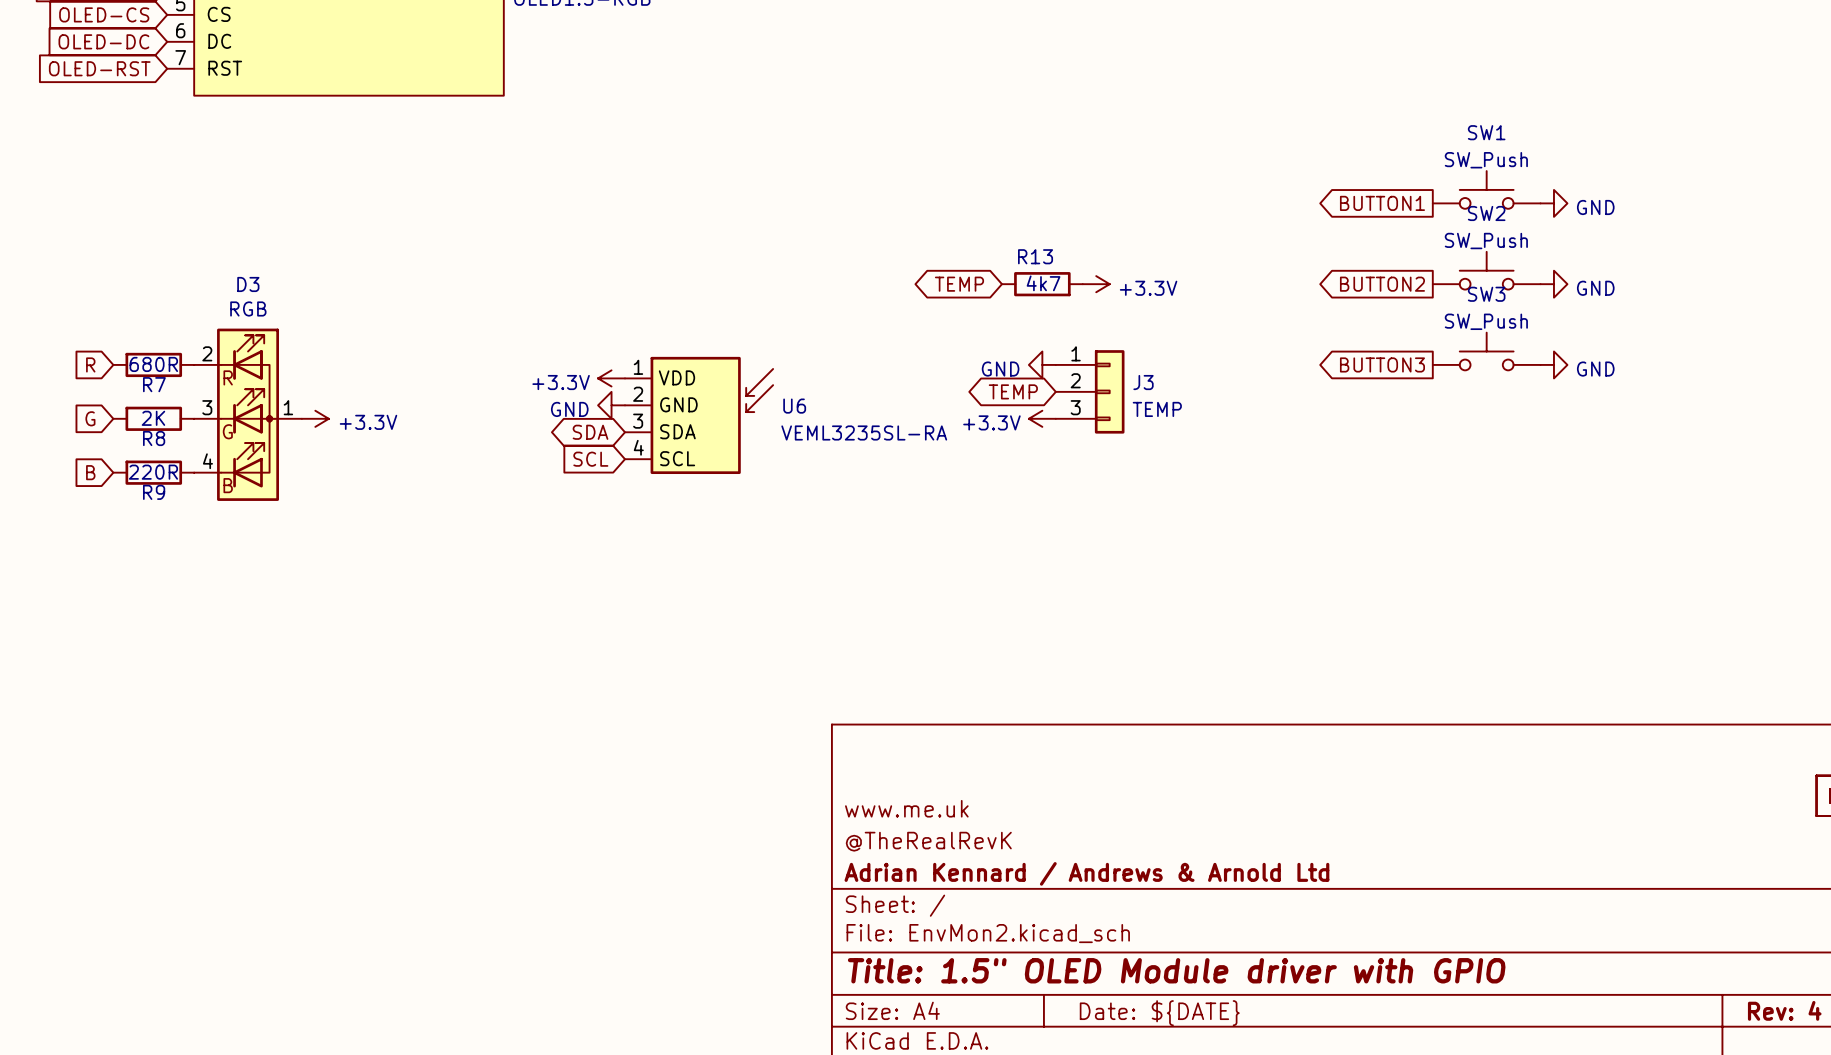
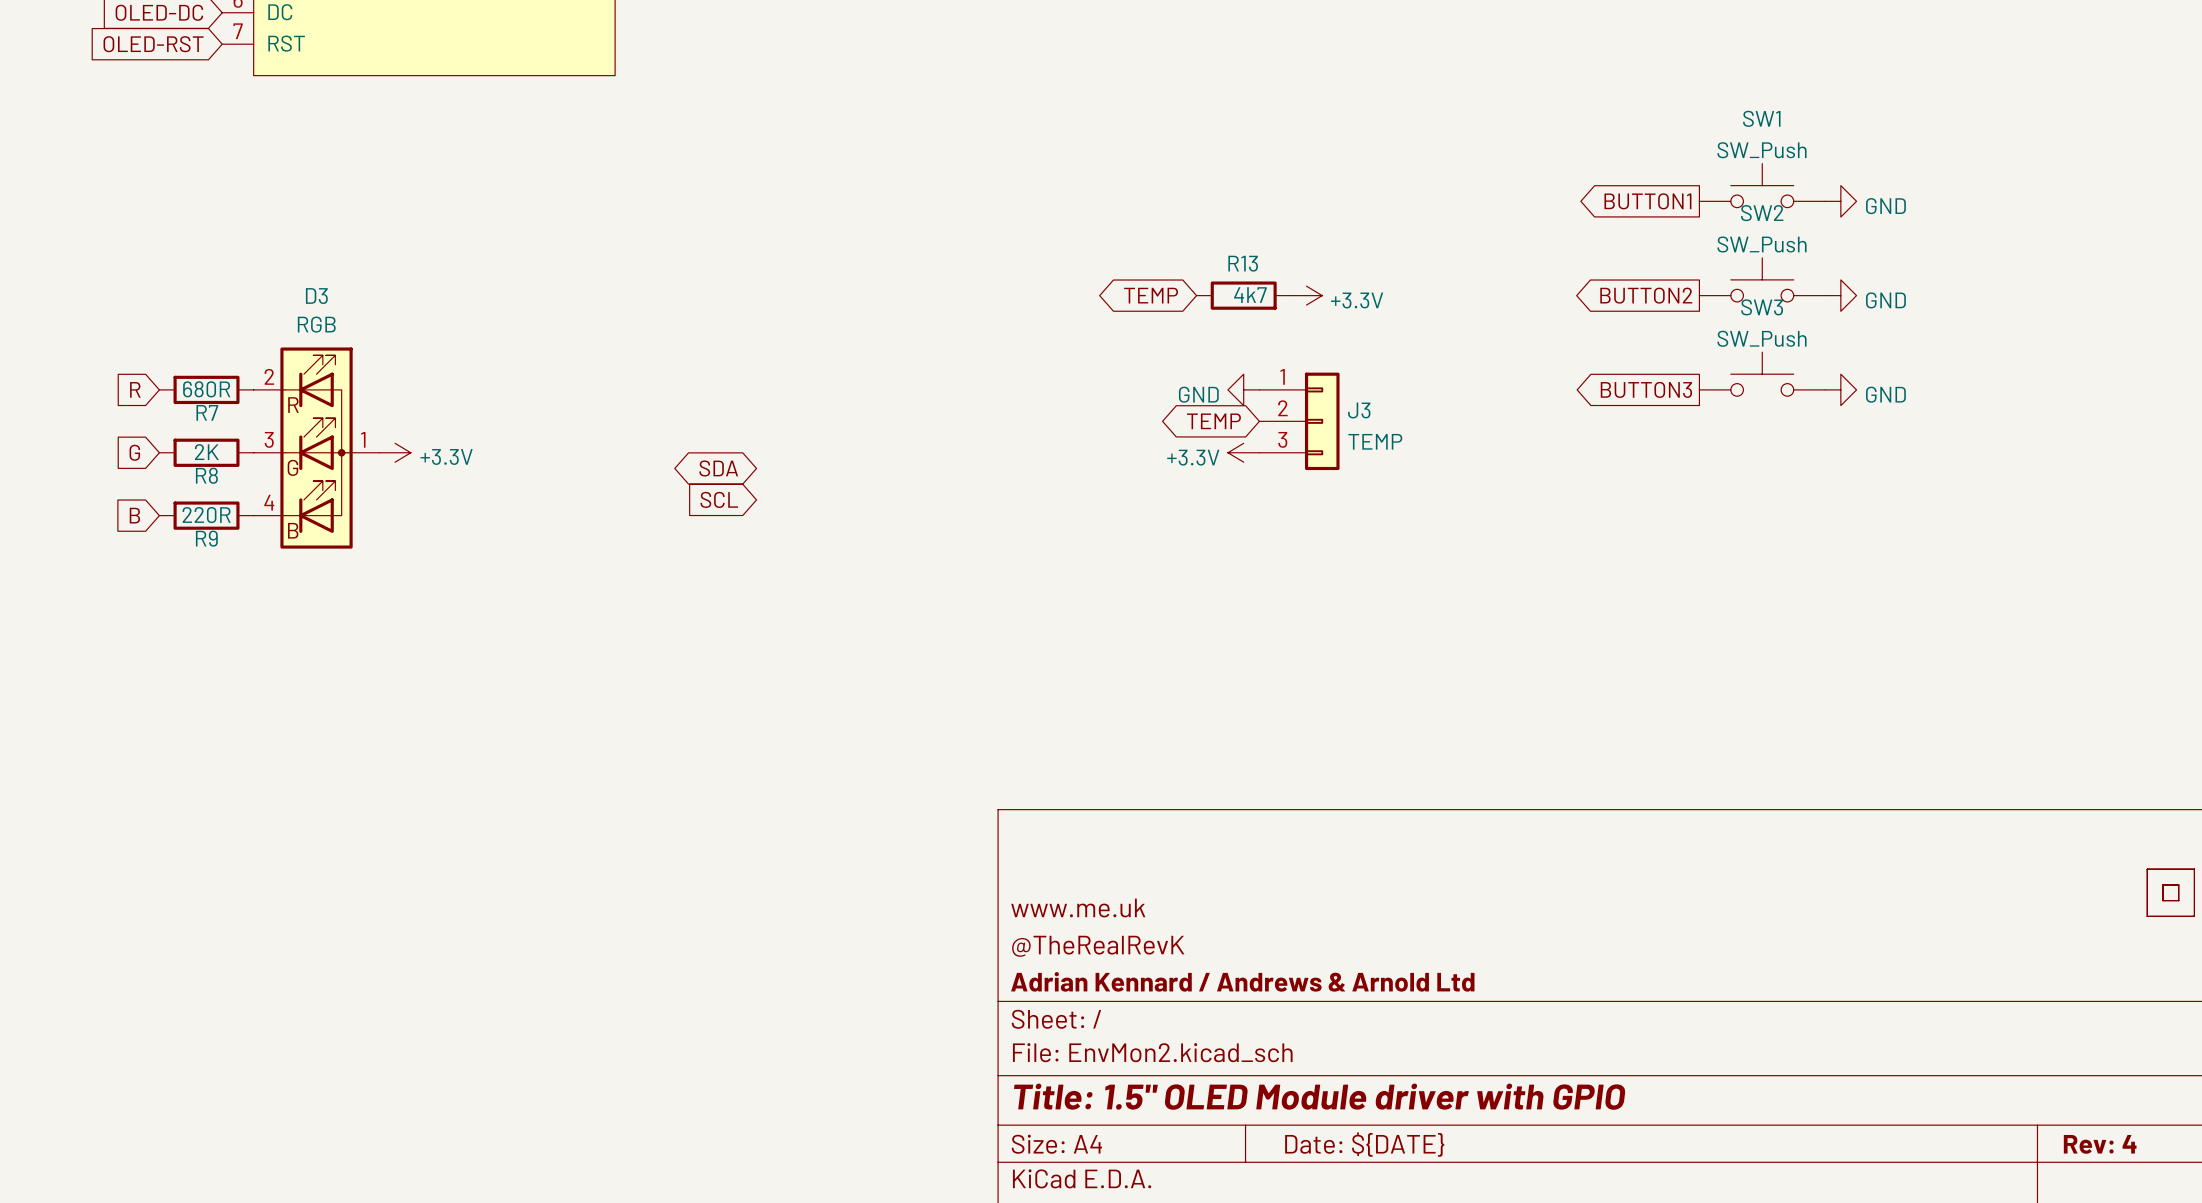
power symbol: +3.3V (611, 378) -> none
power symbol: GND (611, 405) -> none
U6: VEML3235SL-RA (699, 415) -> none

